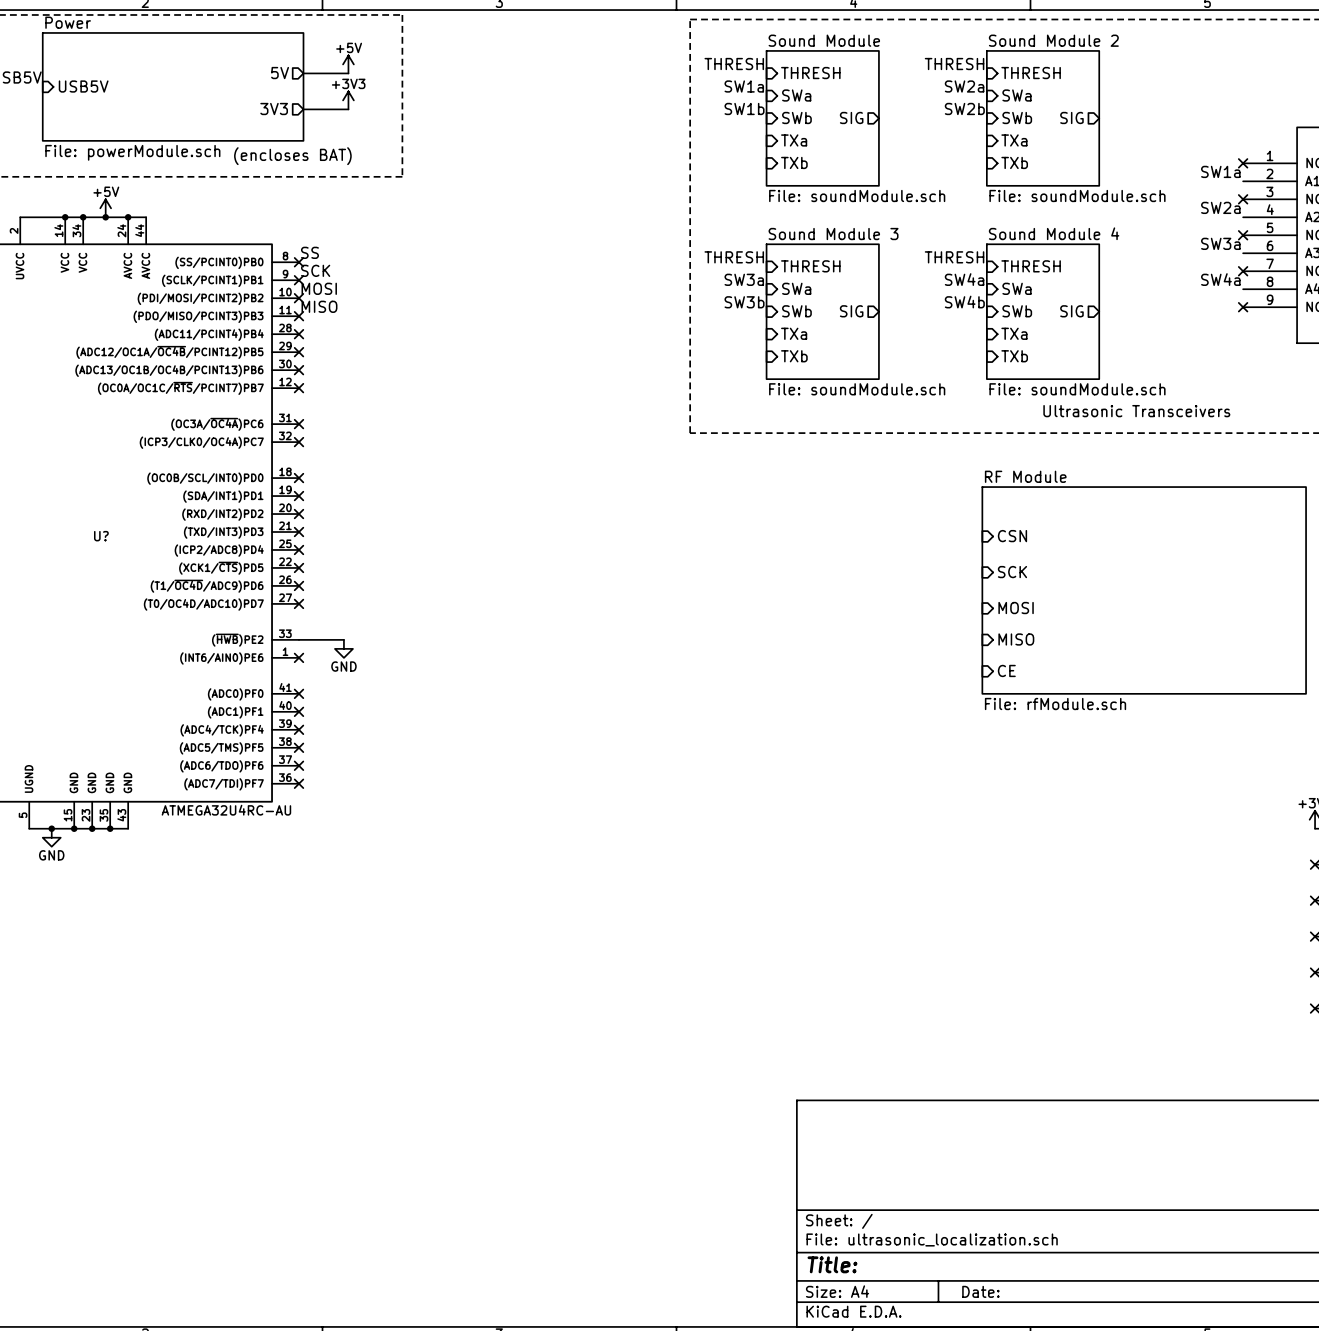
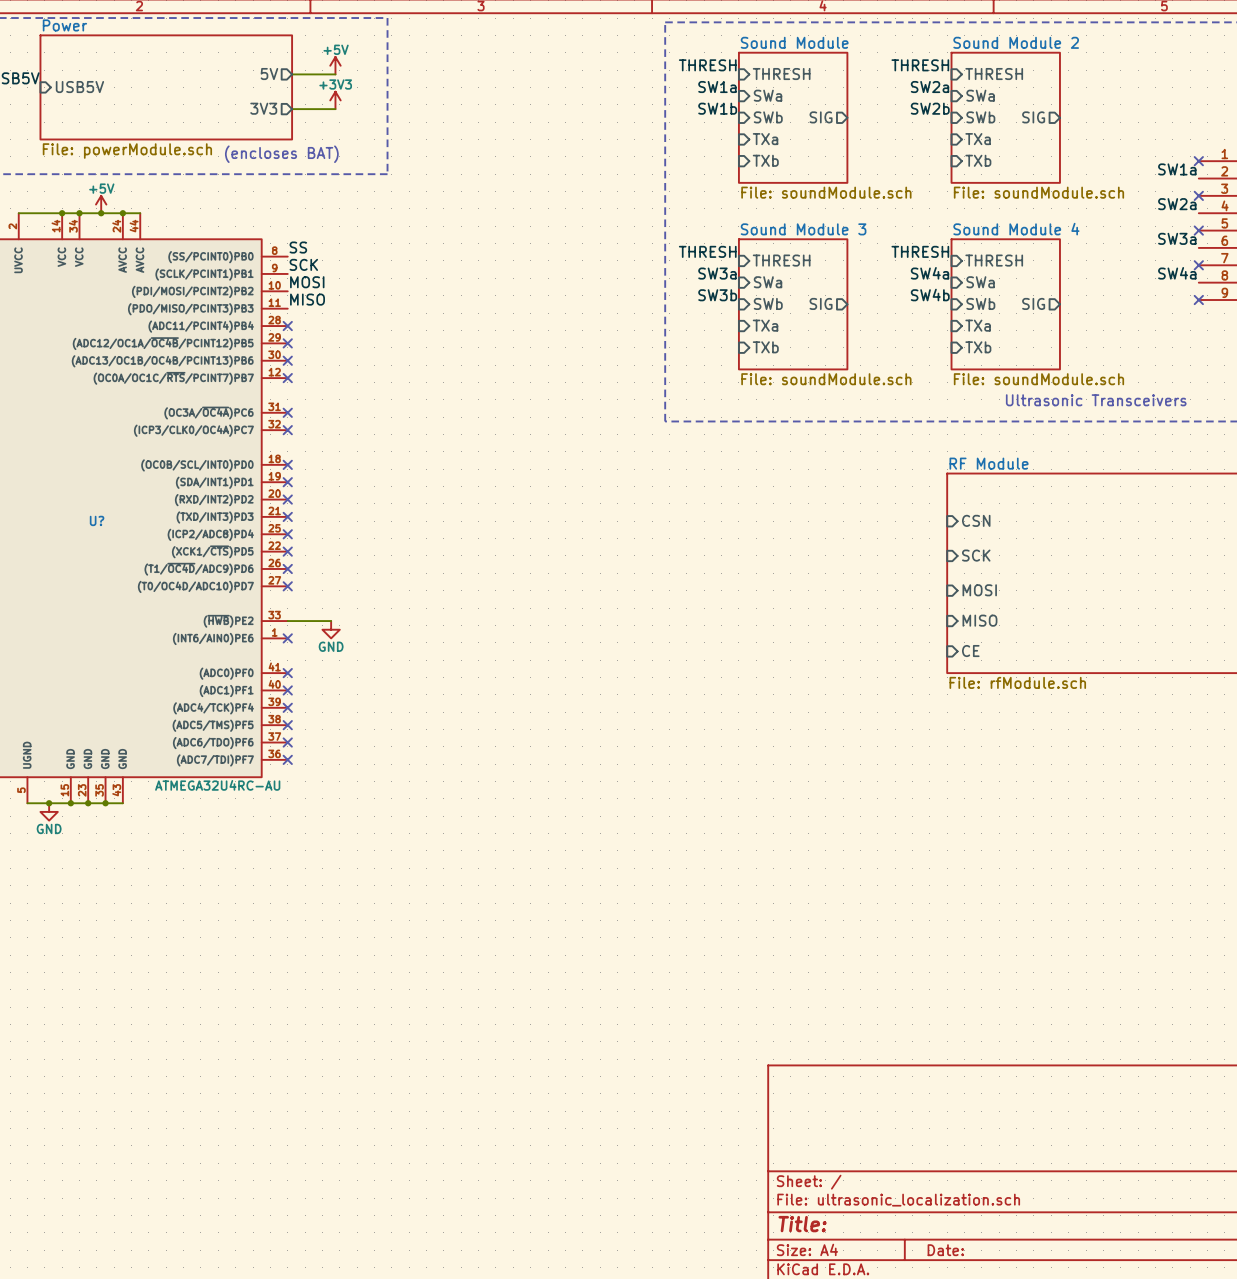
no-connect mark: (299, 262) -> none
no-connect mark: (299, 280) -> none
no-connect mark: (299, 298) -> none
no-connect mark: (299, 316) -> none

